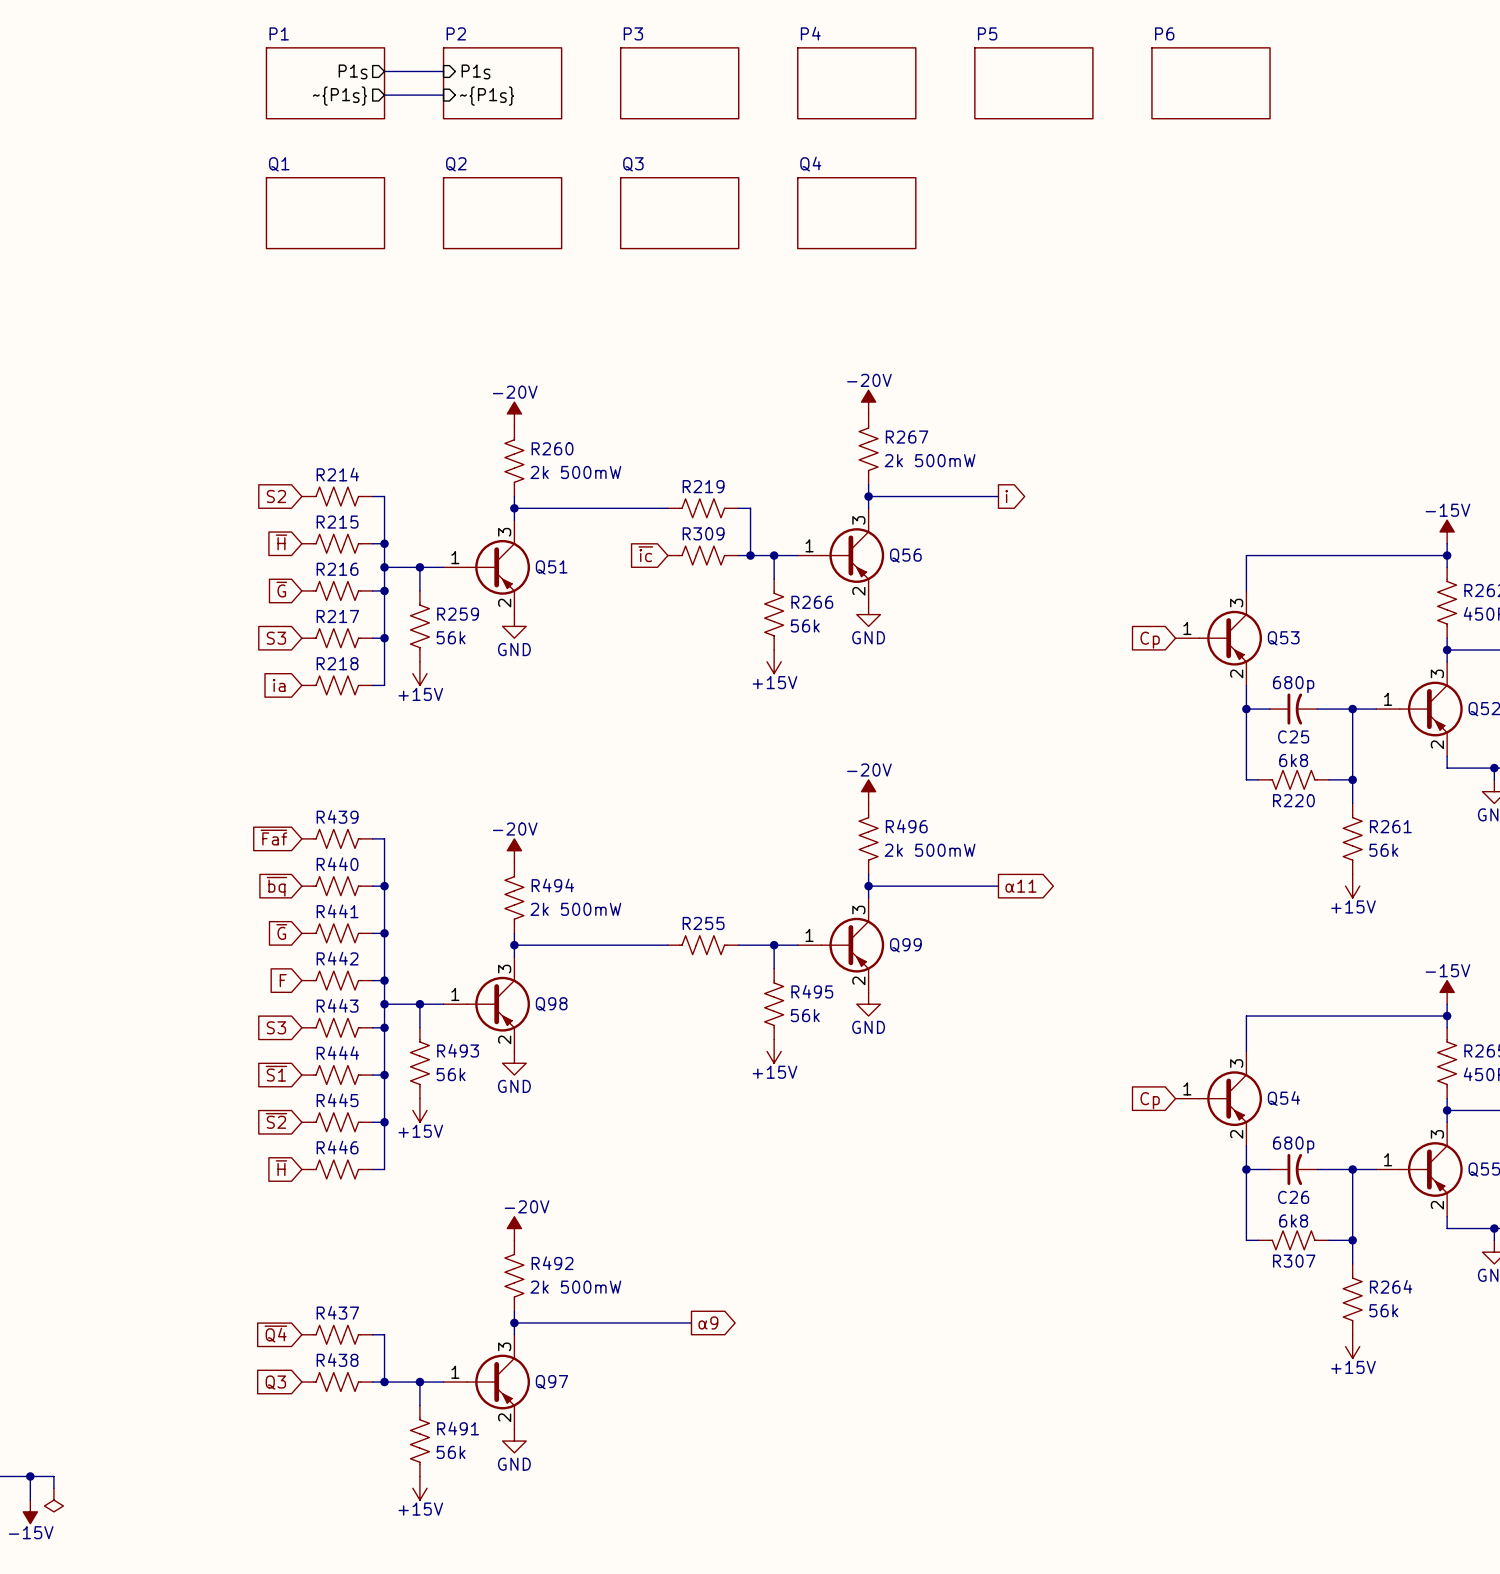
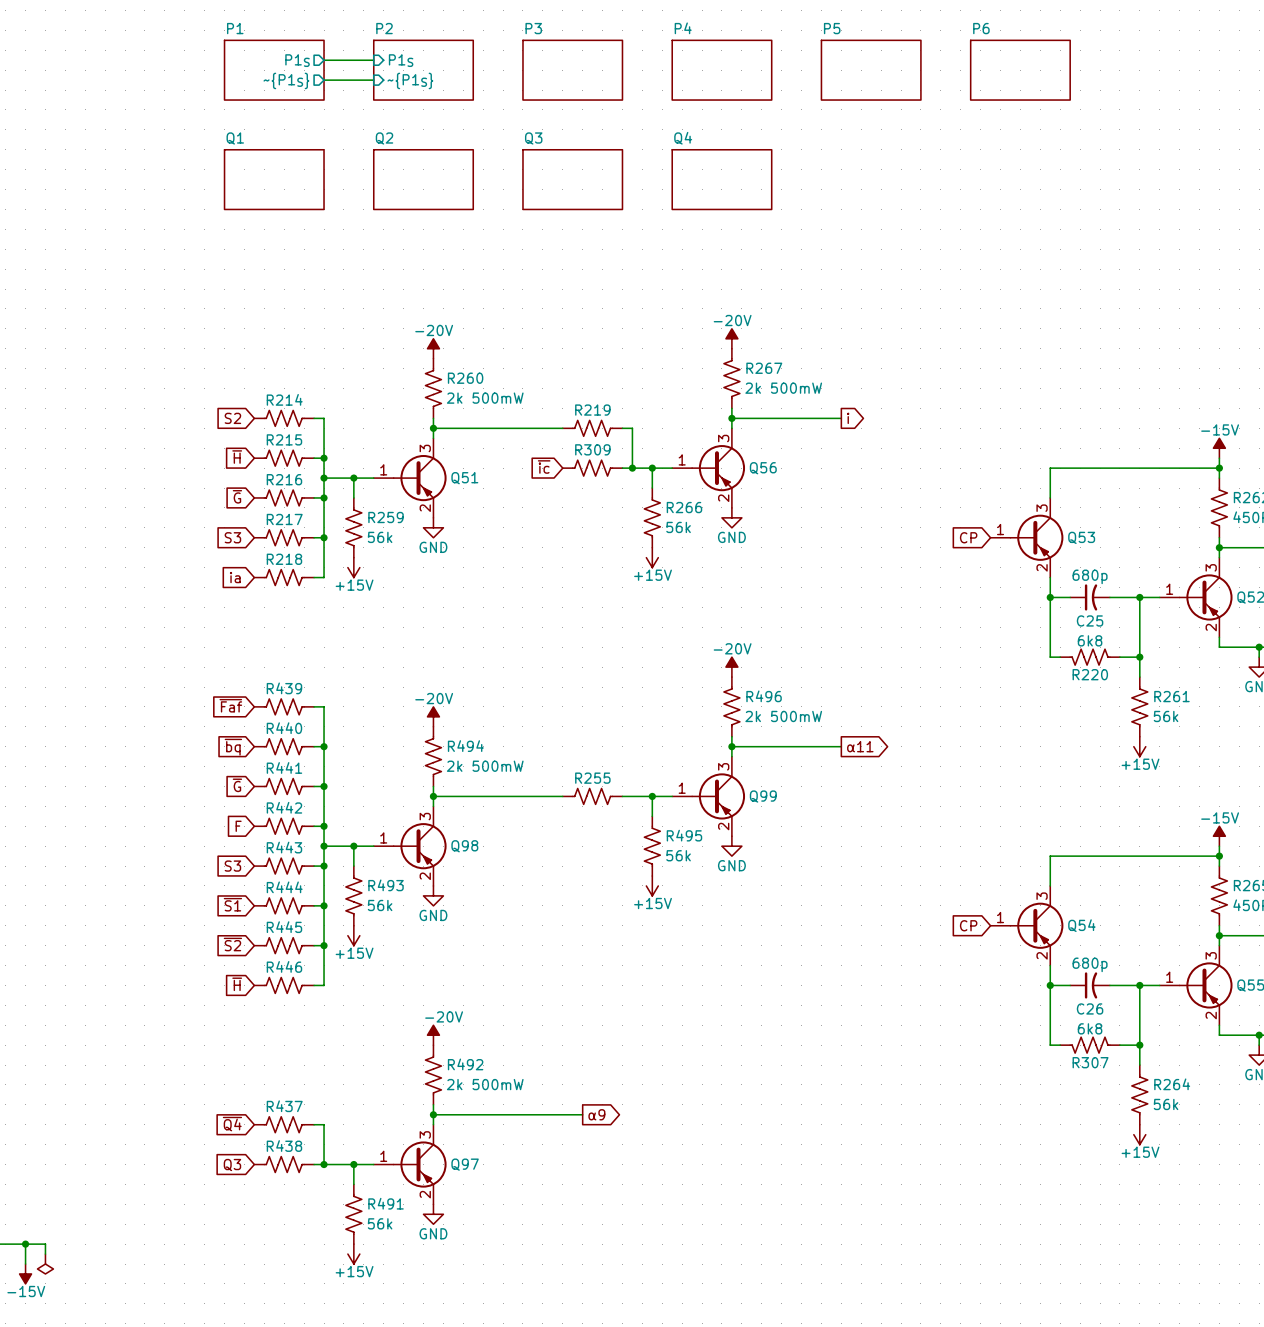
global label: Cp (1150, 640) -> CP (968, 537)
global label: Cp (1150, 1100) -> CP (968, 925)

